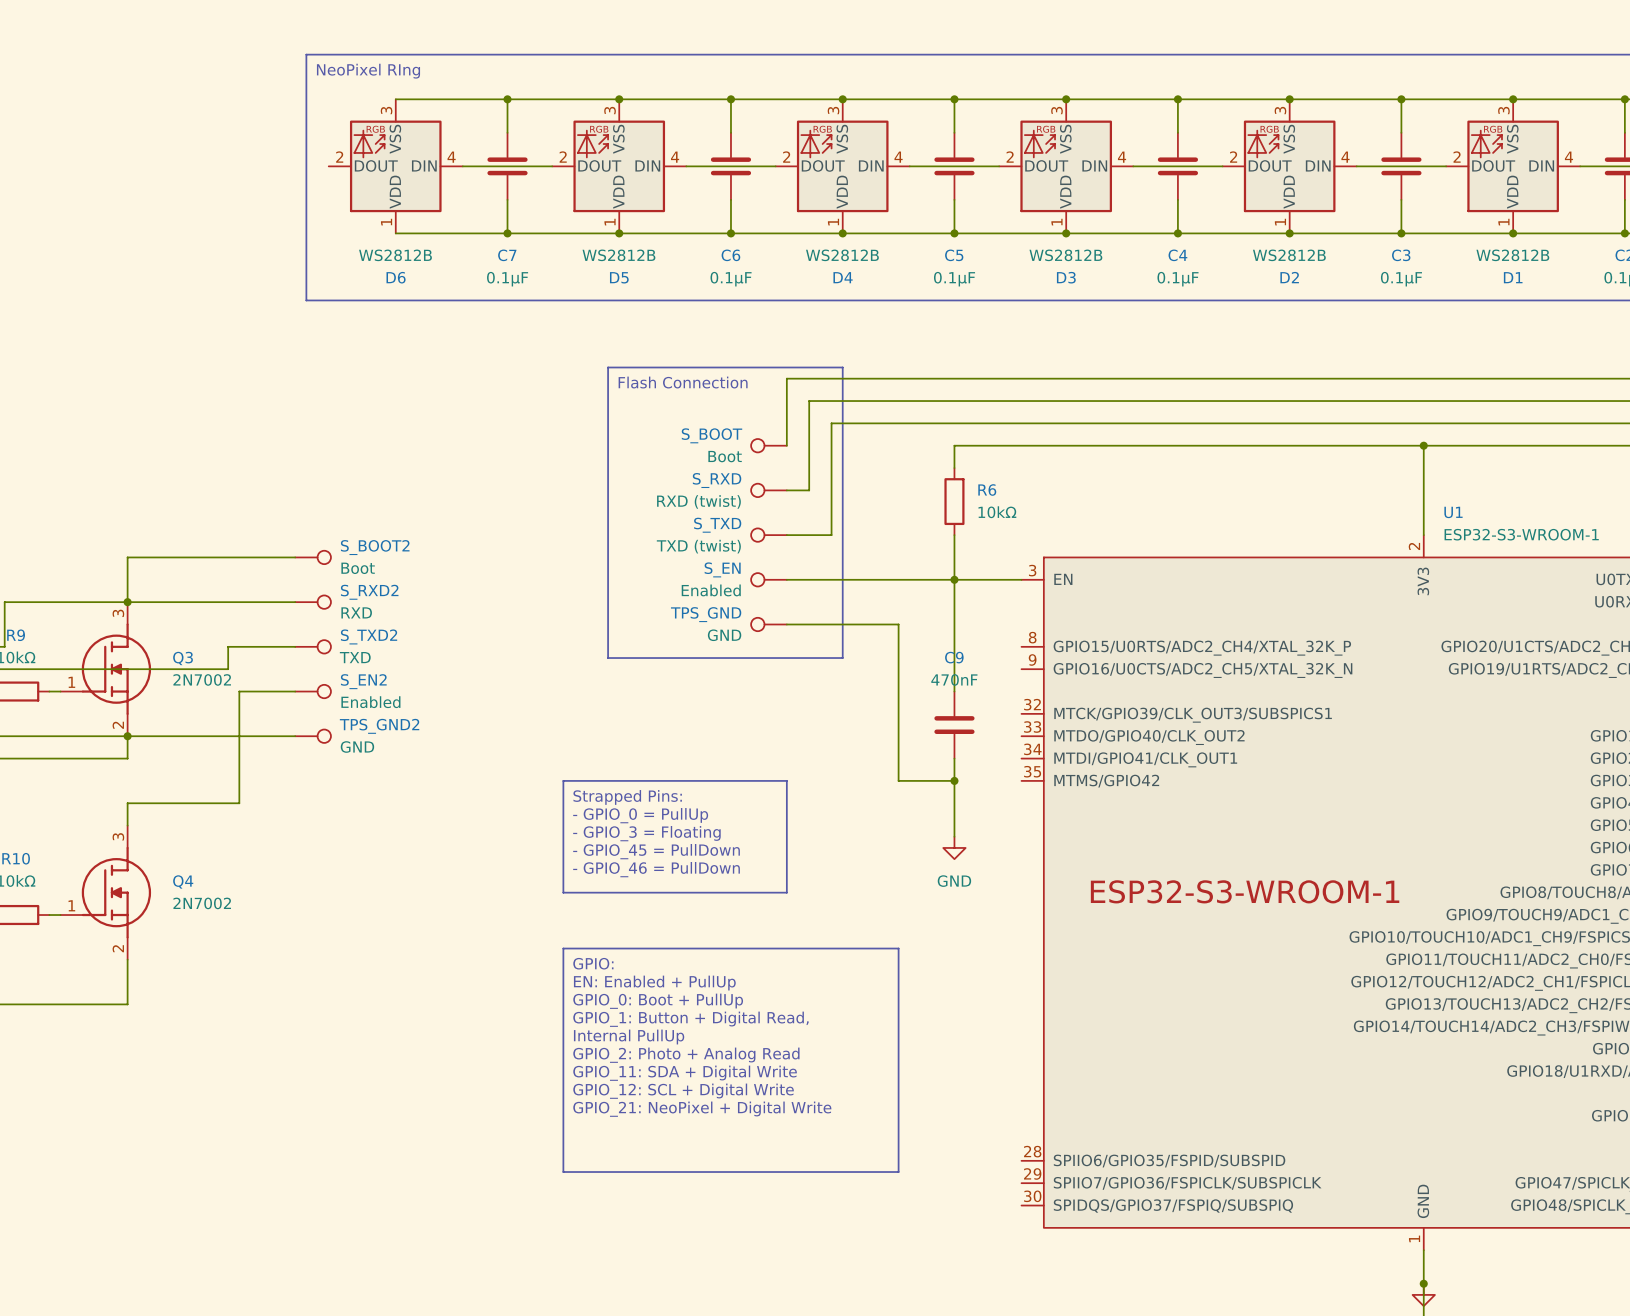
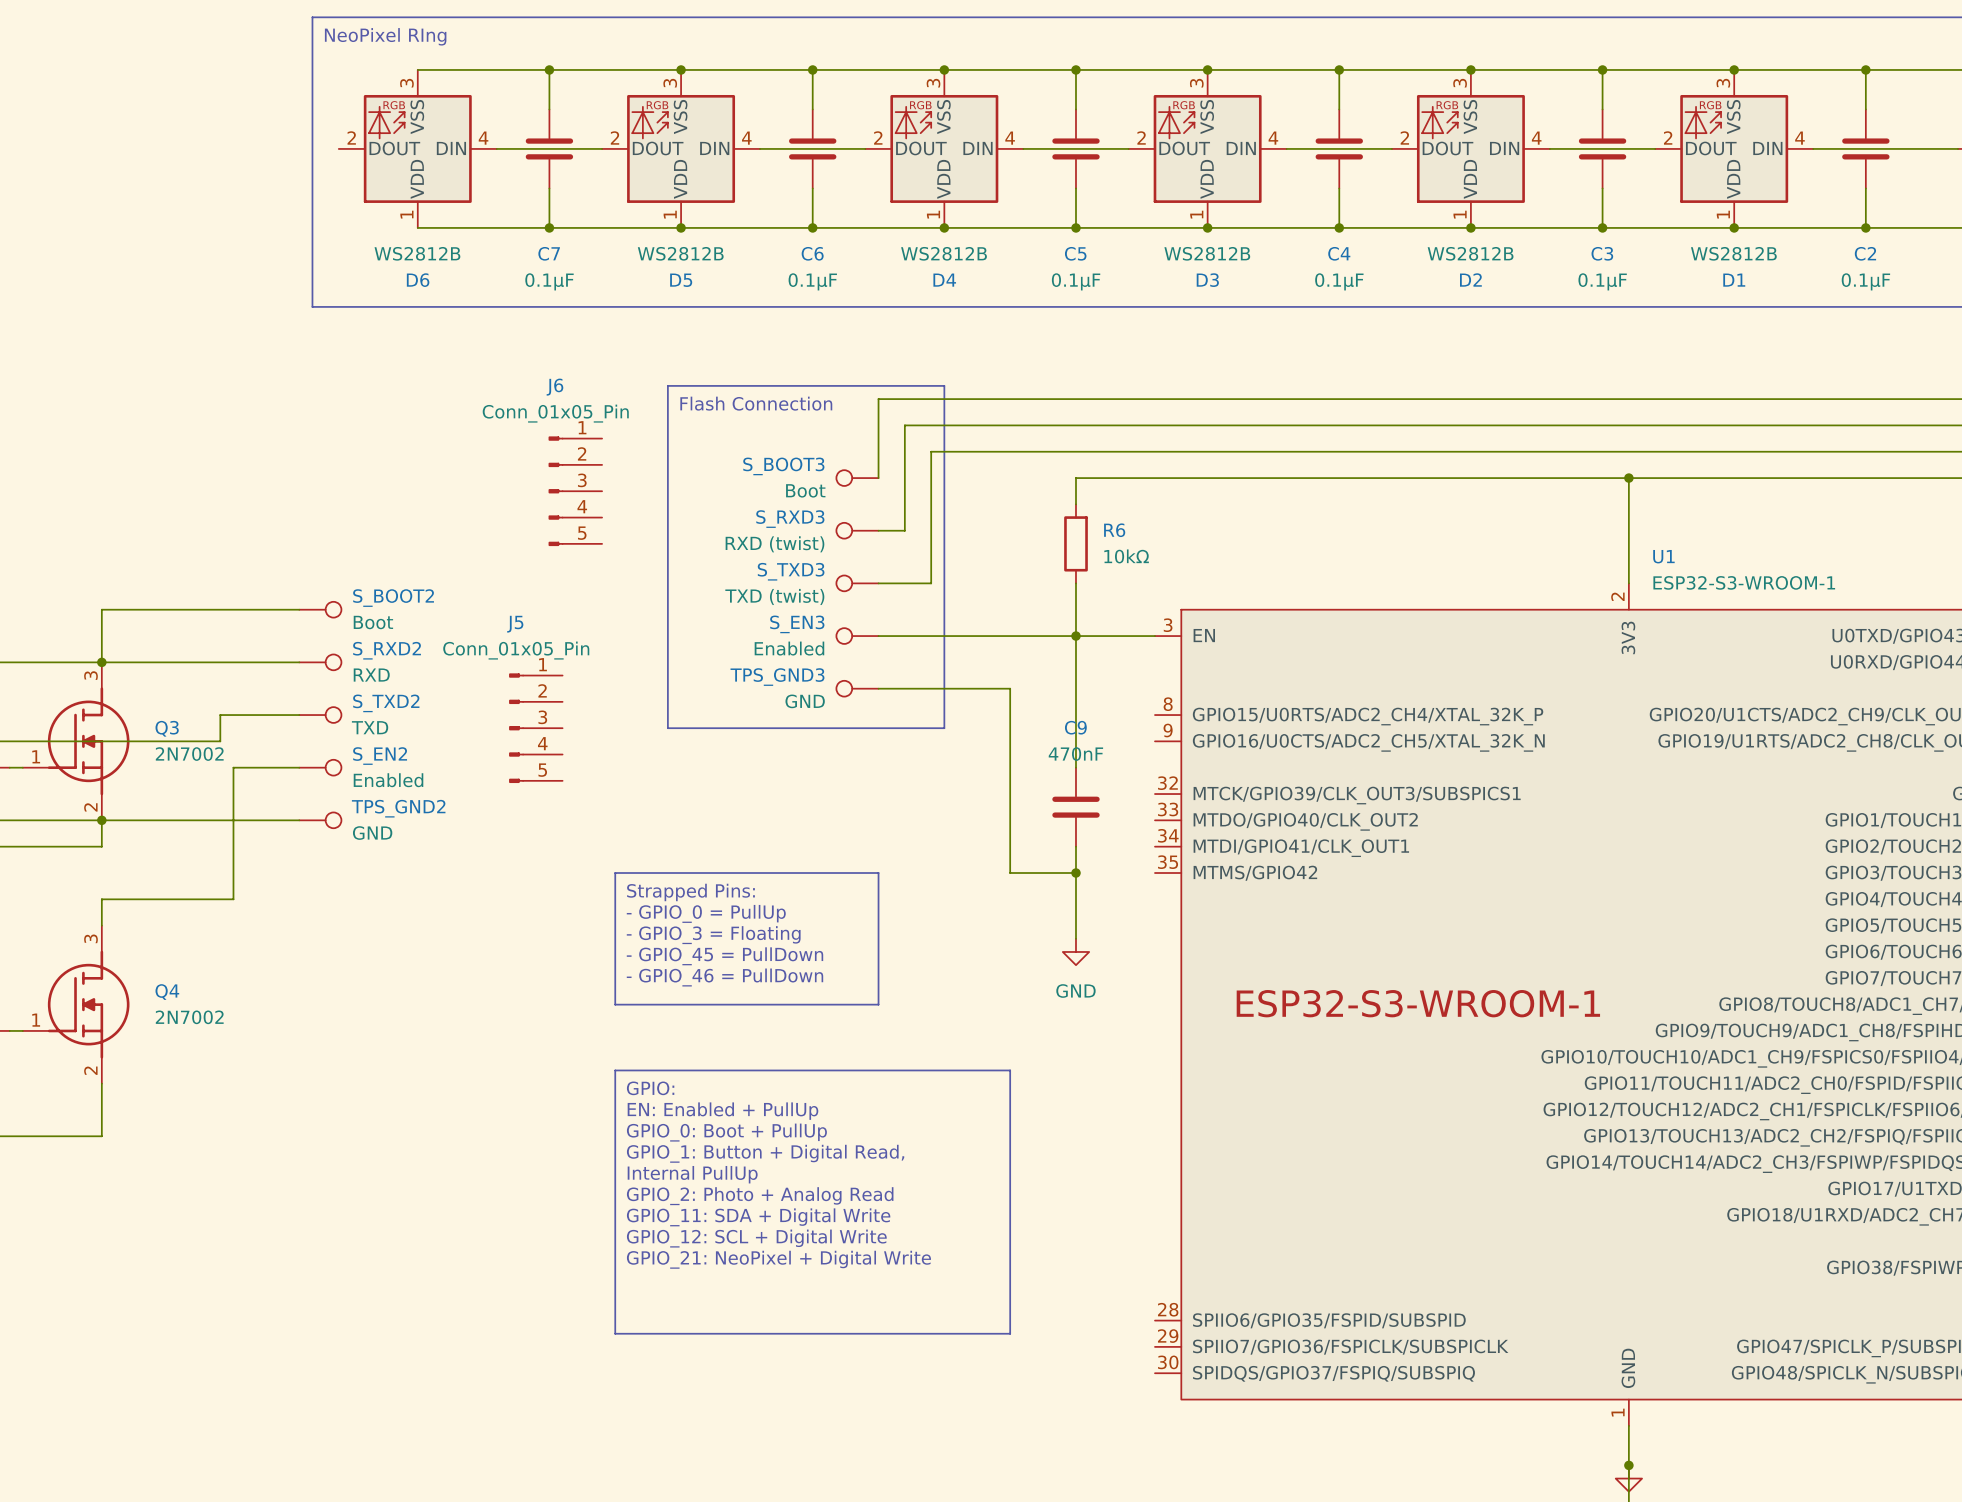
S_BOOT name: S_BOOT (711, 435) -> S_BOOT3 (783, 466)
J6: none -> Conn_01x05_Pin (575, 491)
S_RXD name: S_RXD (717, 480) -> S_RXD3 (790, 519)
S_TXD name: S_TXD (717, 525) -> S_TXD3 (791, 571)
S_EN name: S_EN (722, 569) -> S_EN3 (797, 624)
TPS_GND name: TPS_GND (706, 614) -> TPS_GND3 (777, 677)
J5: none -> Conn_01x05_Pin (535, 728)

